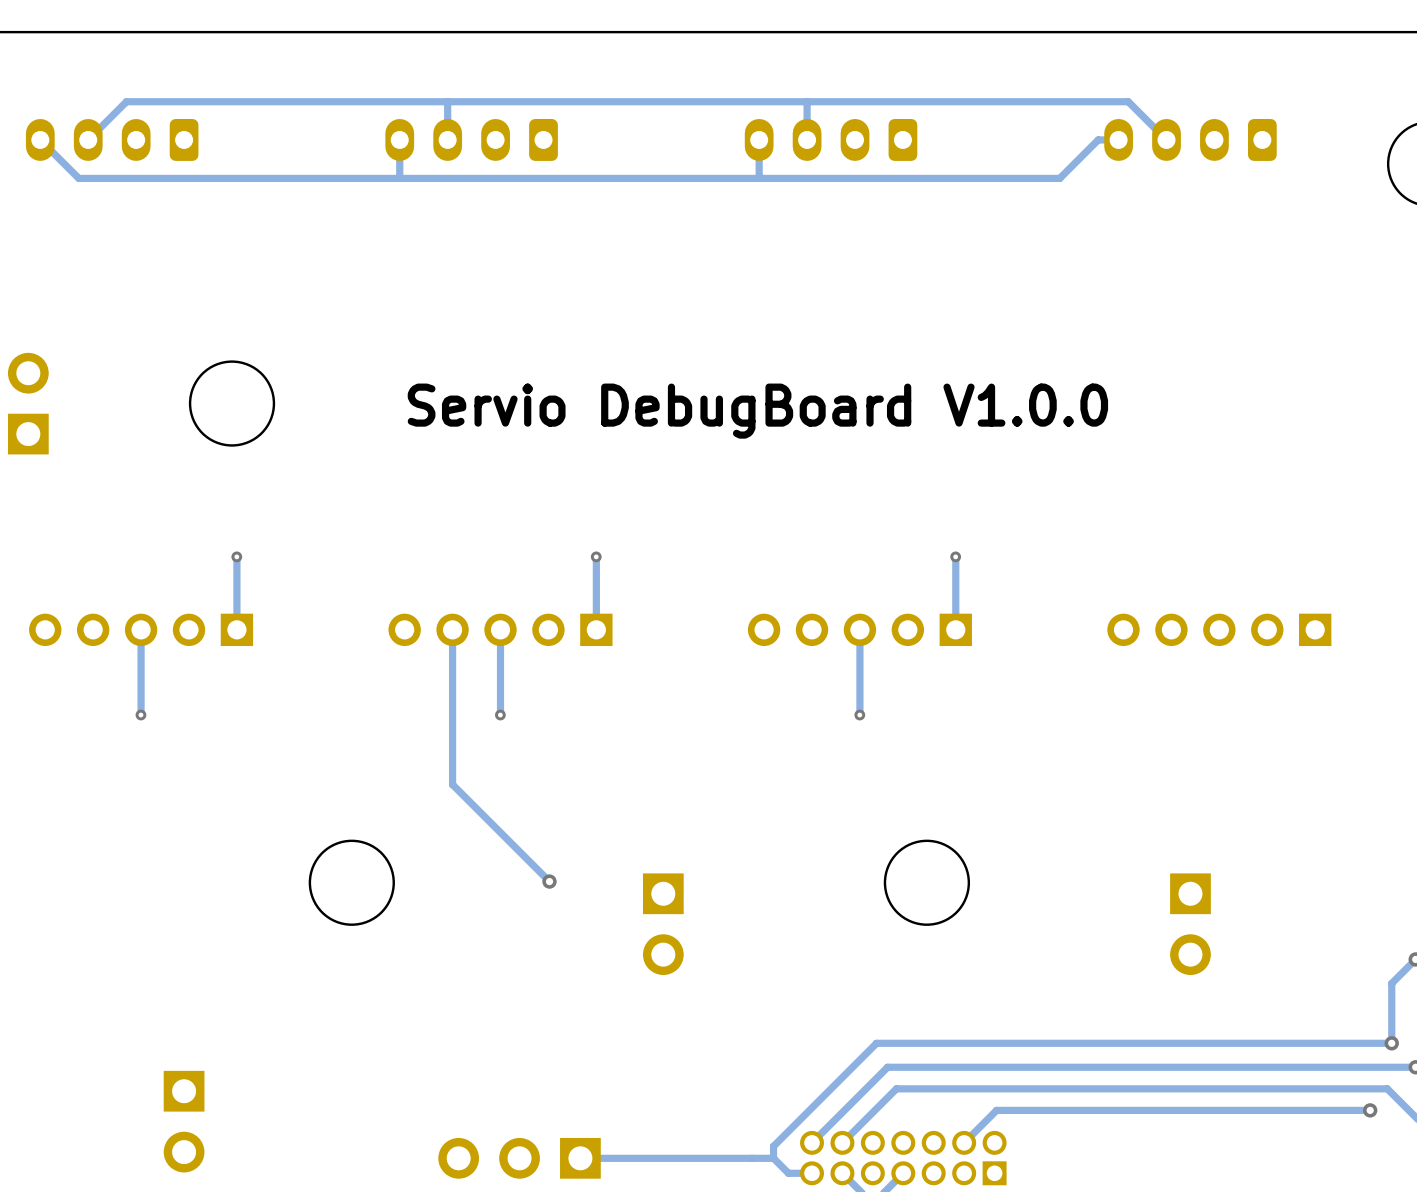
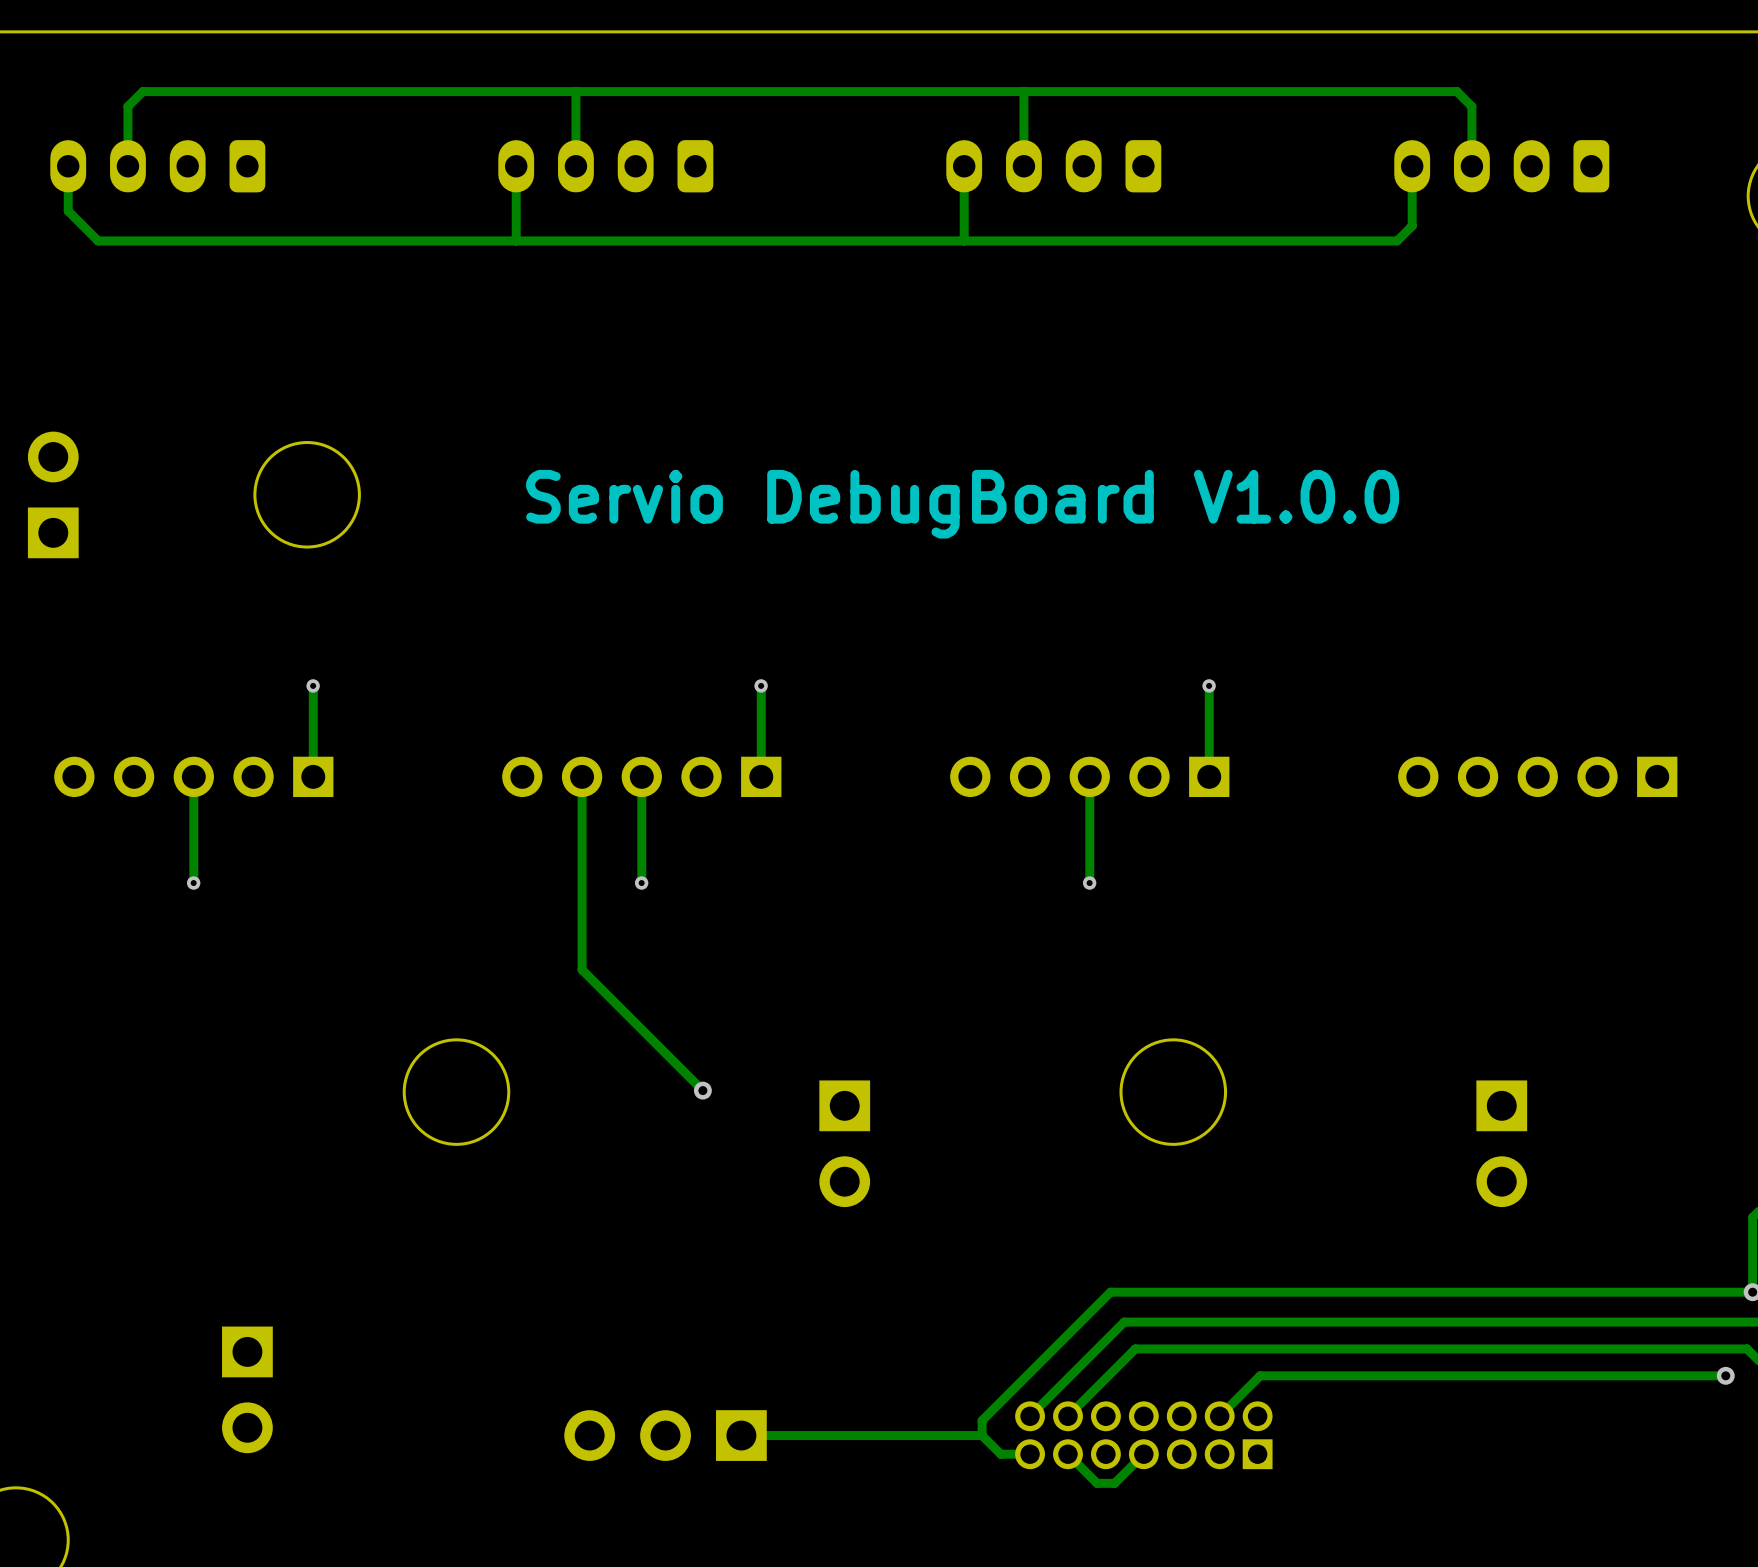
track: none -> (575, 91) (575, 118)
track: none -> (1023, 91) (1023, 118)
track: (1118, 139) (1098, 139) (1059, 178) (78, 178) (40, 139) -> (1412, 166) (1412, 225) (1397, 240) (98, 240) (68, 211) (68, 166)
track: (1166, 139) (1128, 101) (126, 101) (88, 139) -> (1471, 166) (1471, 106) (1456, 91) (142, 91) (127, 106) (127, 166)
track: none -> (516, 214) (516, 240)
track: none -> (964, 214) (964, 240)

